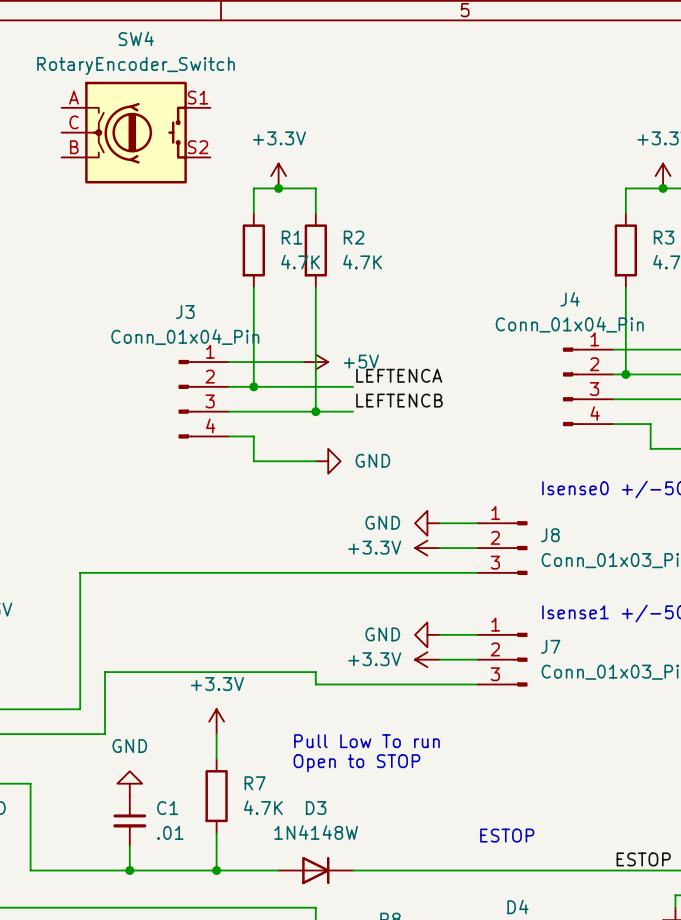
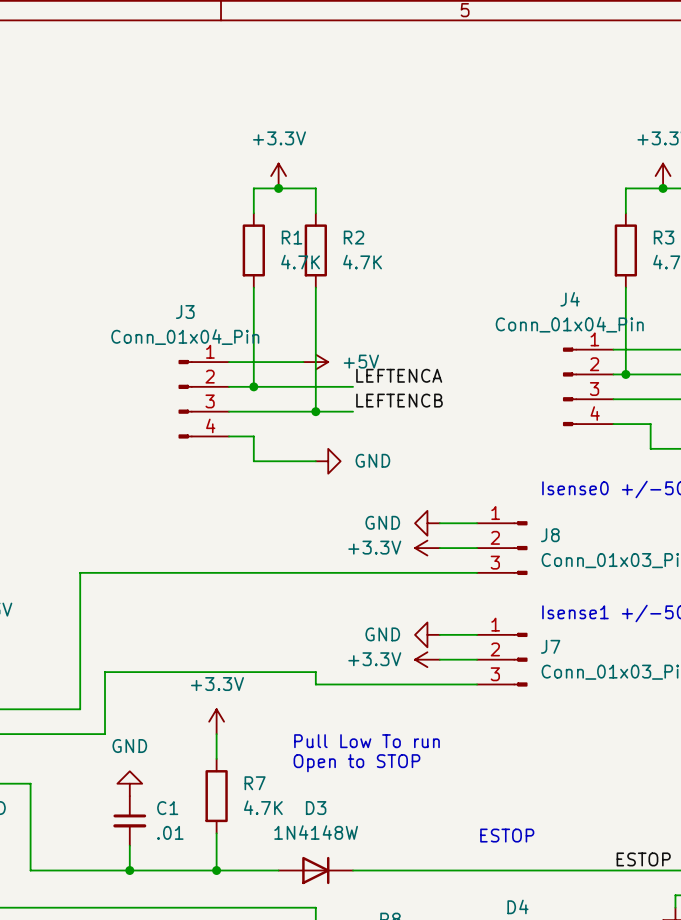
SW4: RotaryEncoder_Switch (136, 132) -> none

